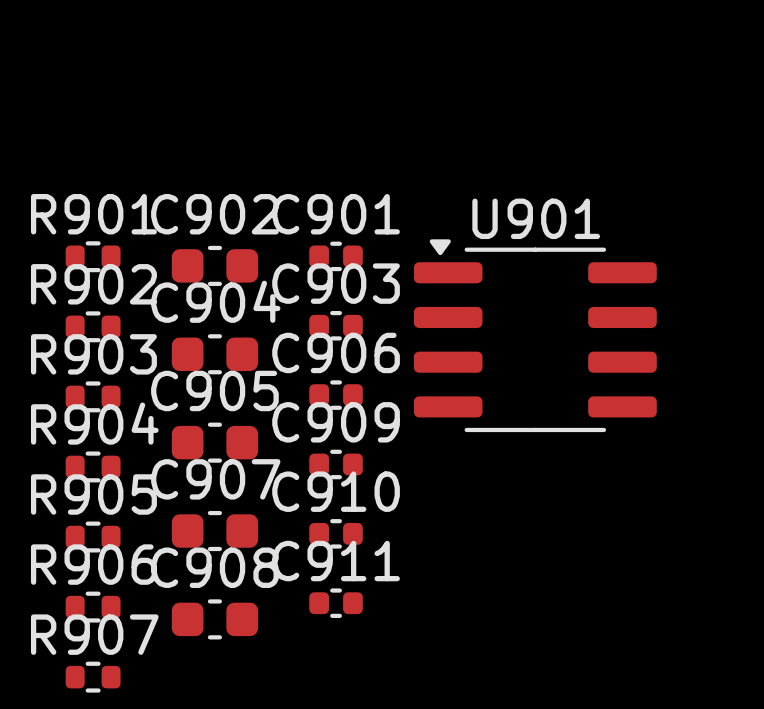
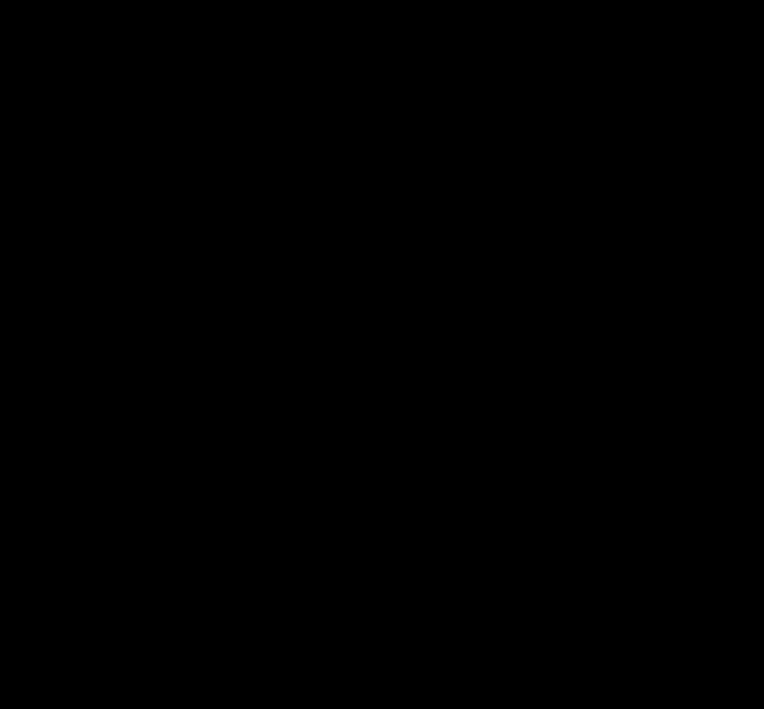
R901: (93, 256) -> none
C901: (336, 256) -> none
C902: (214, 265) -> none
C903: (336, 325) -> none
R902: (93, 326) -> none
U901: (535, 335) -> none
C904: (214, 354) -> none
C906: (336, 395) -> none
R903: (93, 396) -> none
C905: (214, 442) -> none
C909: (336, 464) -> none
R904: (93, 466) -> none
C907: (214, 531) -> none
C910: (336, 533) -> none
R905: (93, 537) -> none
C911: (336, 603) -> none
R906: (93, 607) -> none
C908: (214, 619) -> none
R907: (93, 677) -> none

